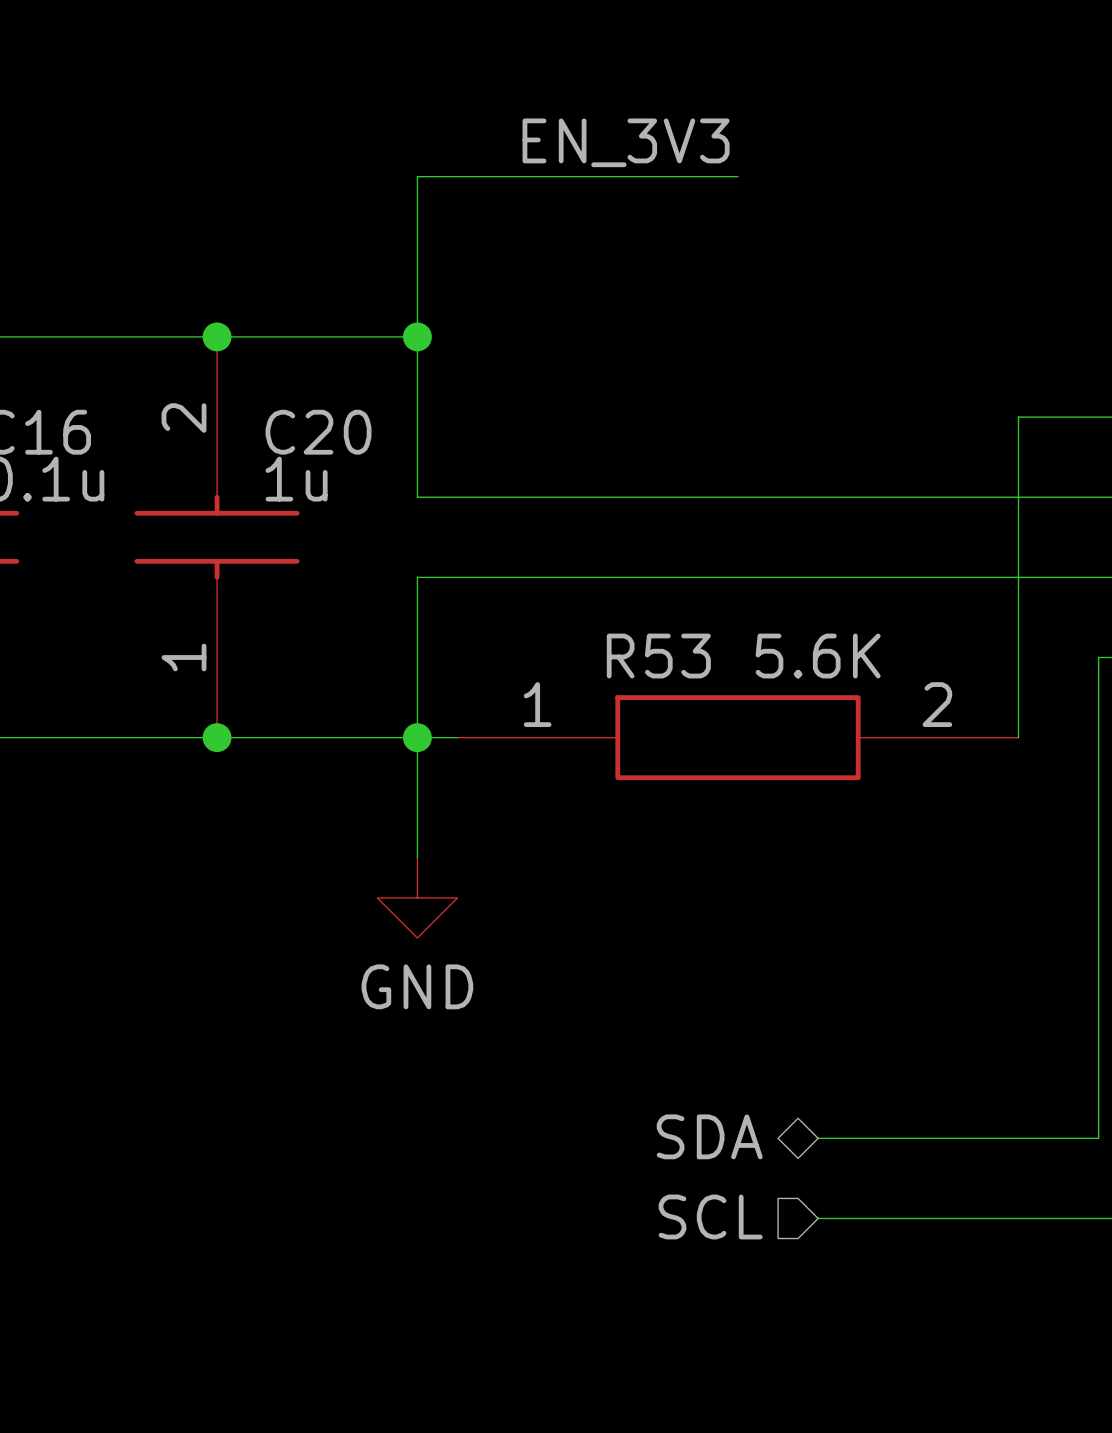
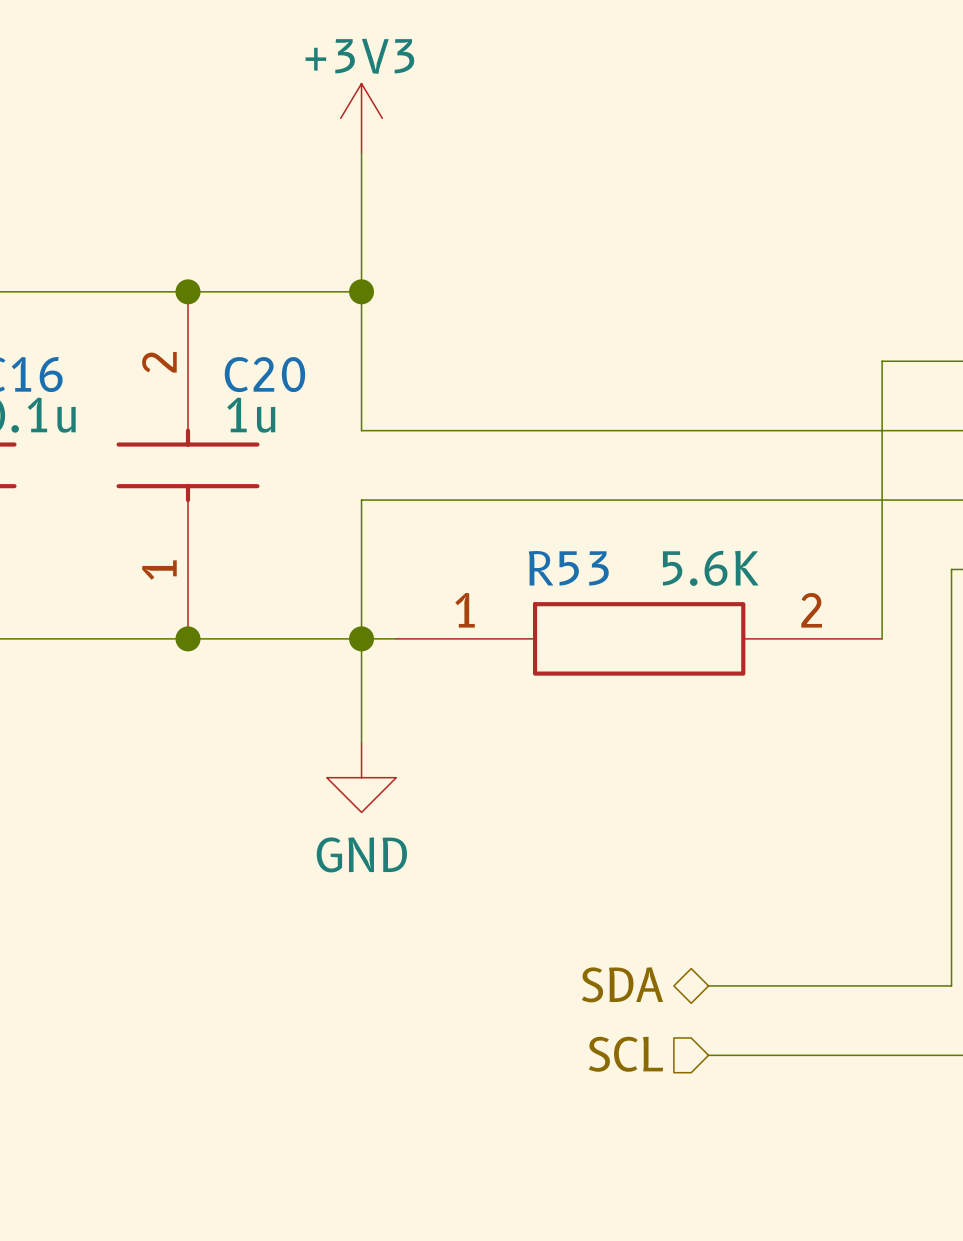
power symbol: none -> +3V3 (361, 118)
label: EN_3V3 (626, 142) -> none
wire: (417, 176) (737, 176) -> none

